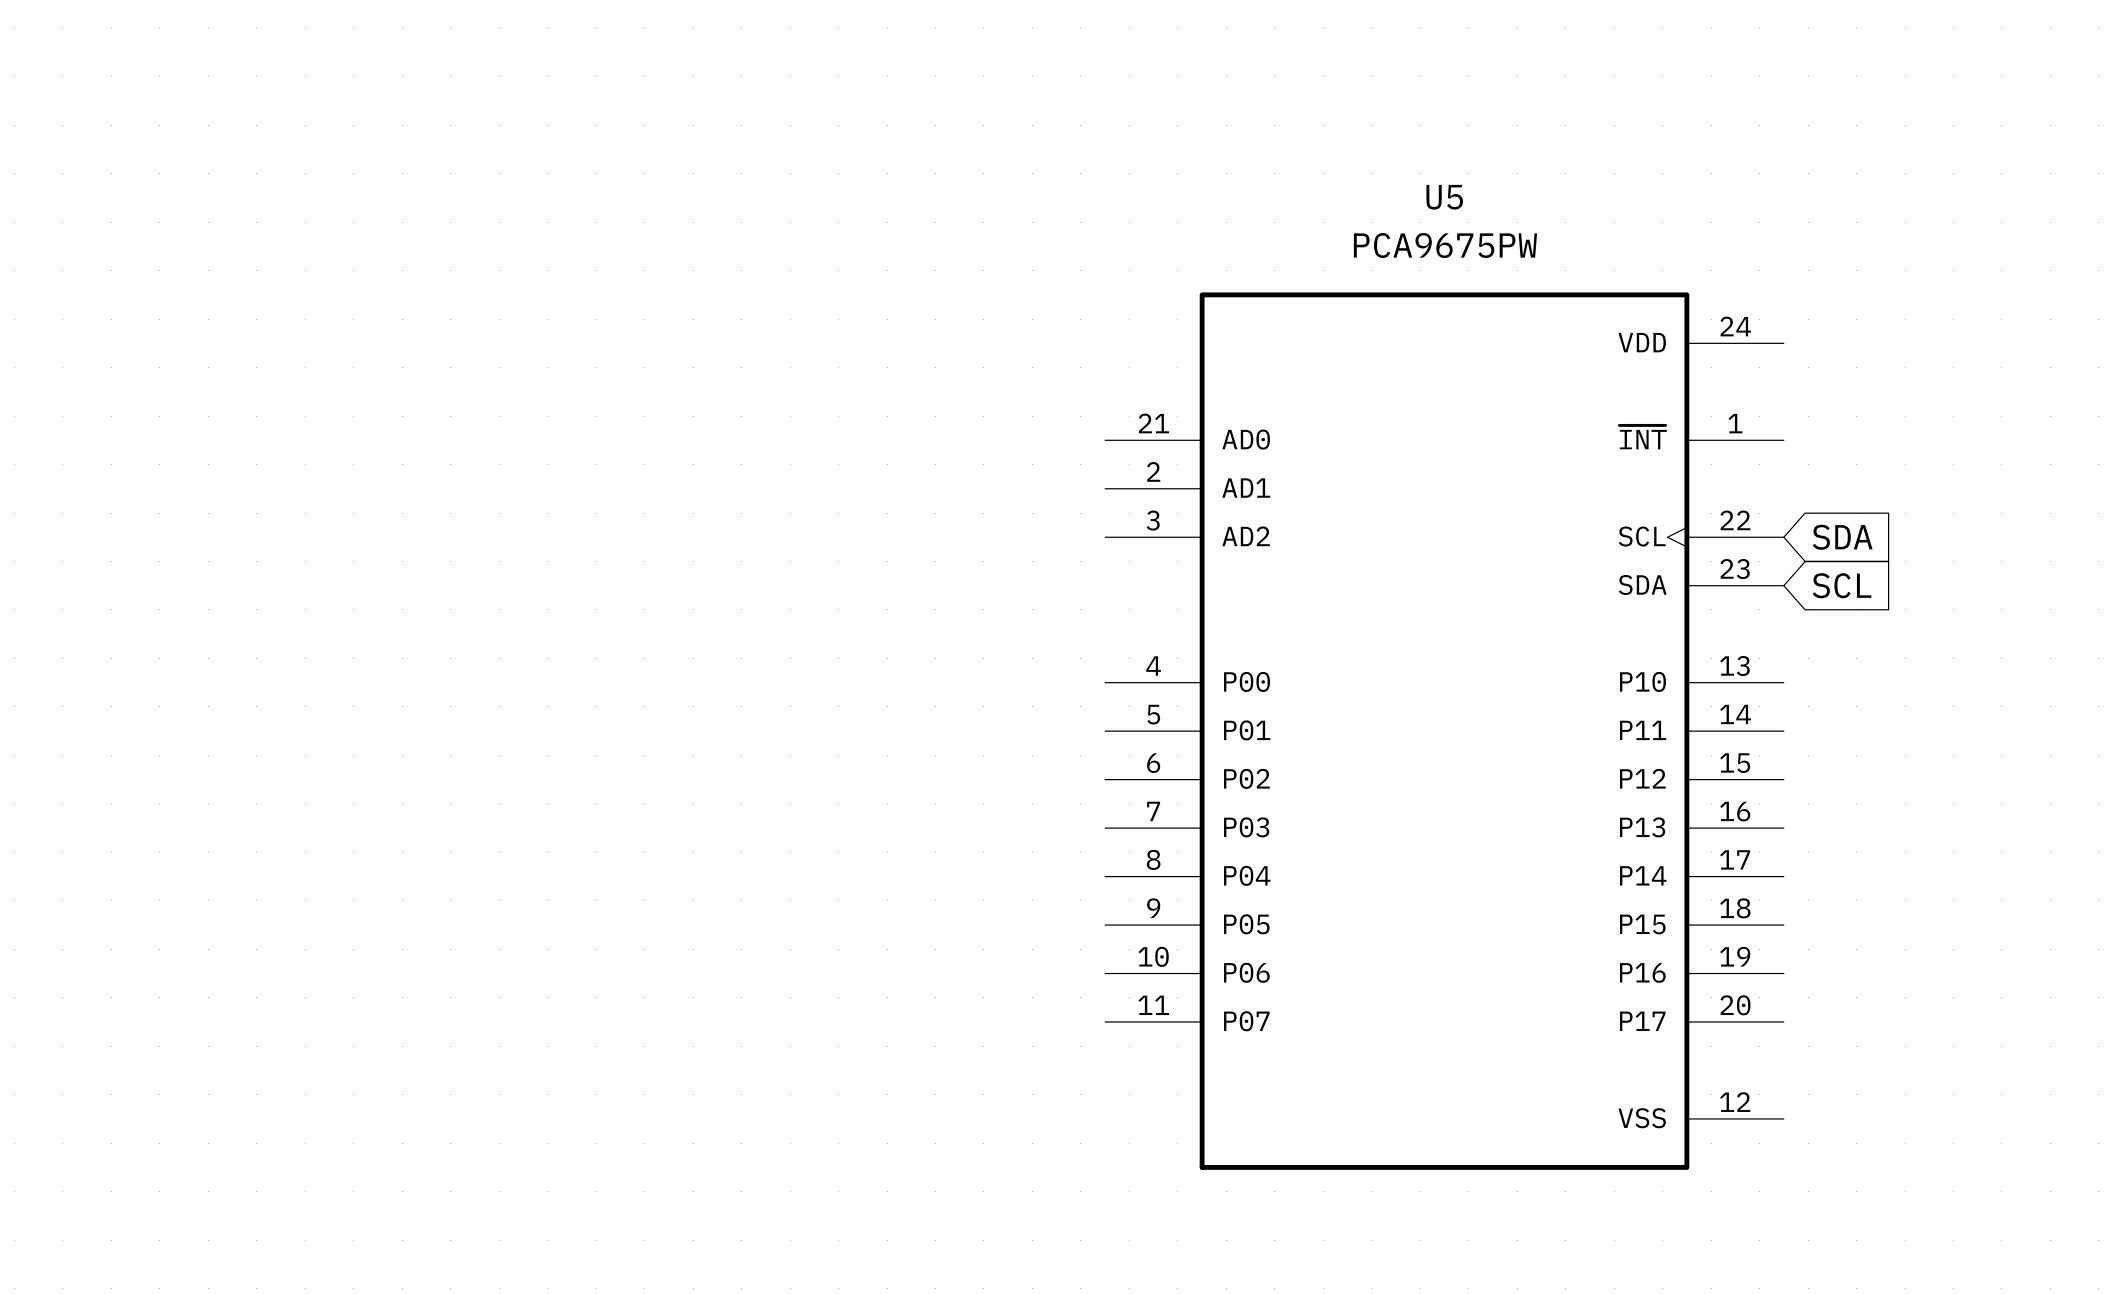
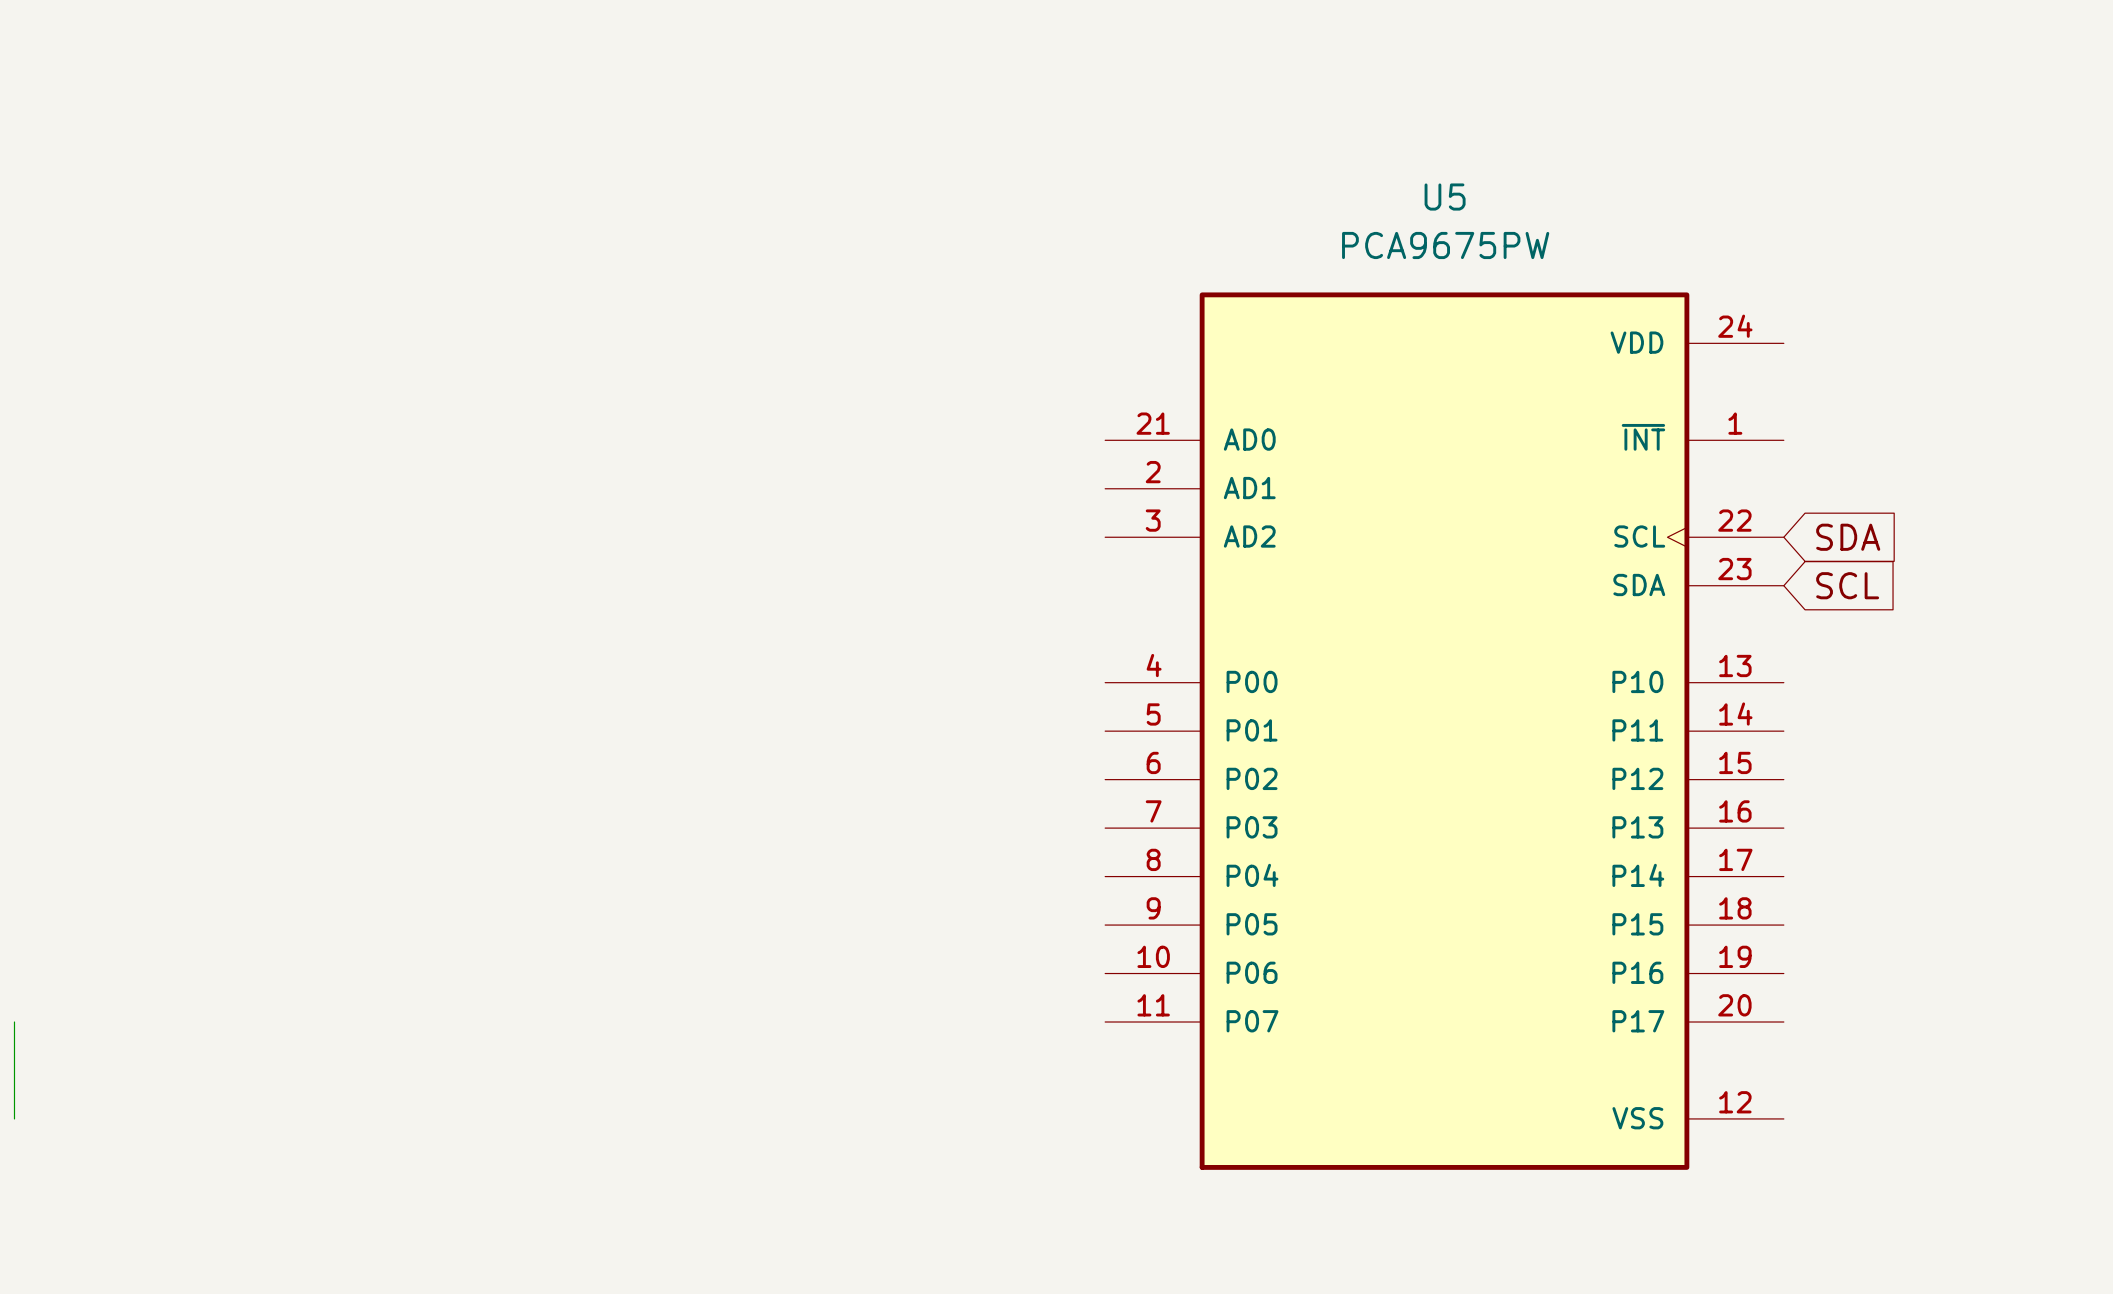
wire: none -> (14, 1022) (14, 1118)

